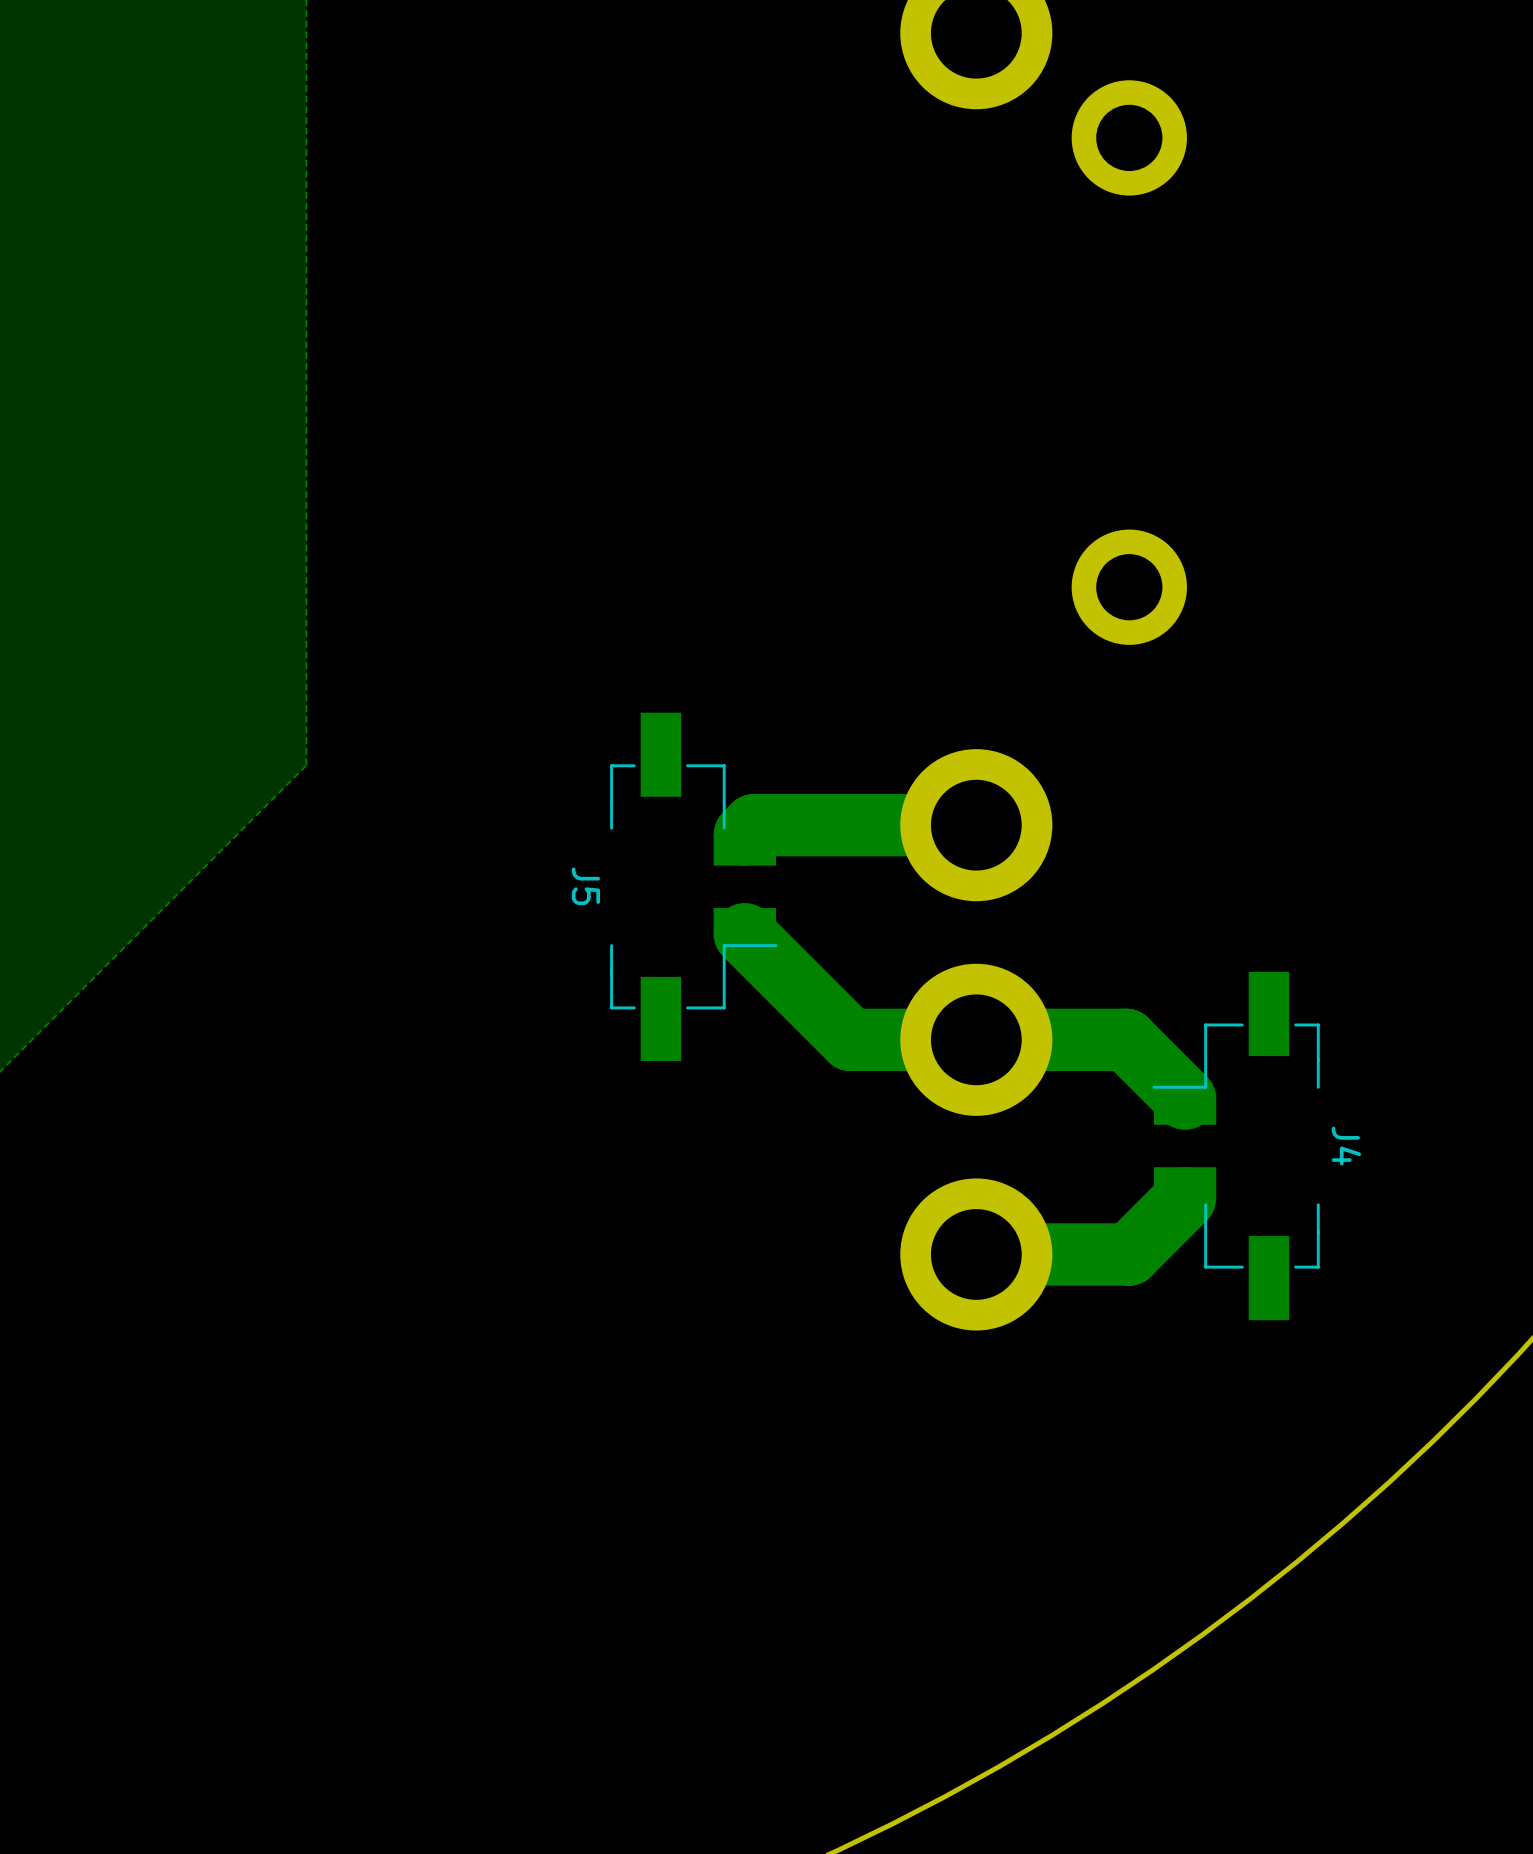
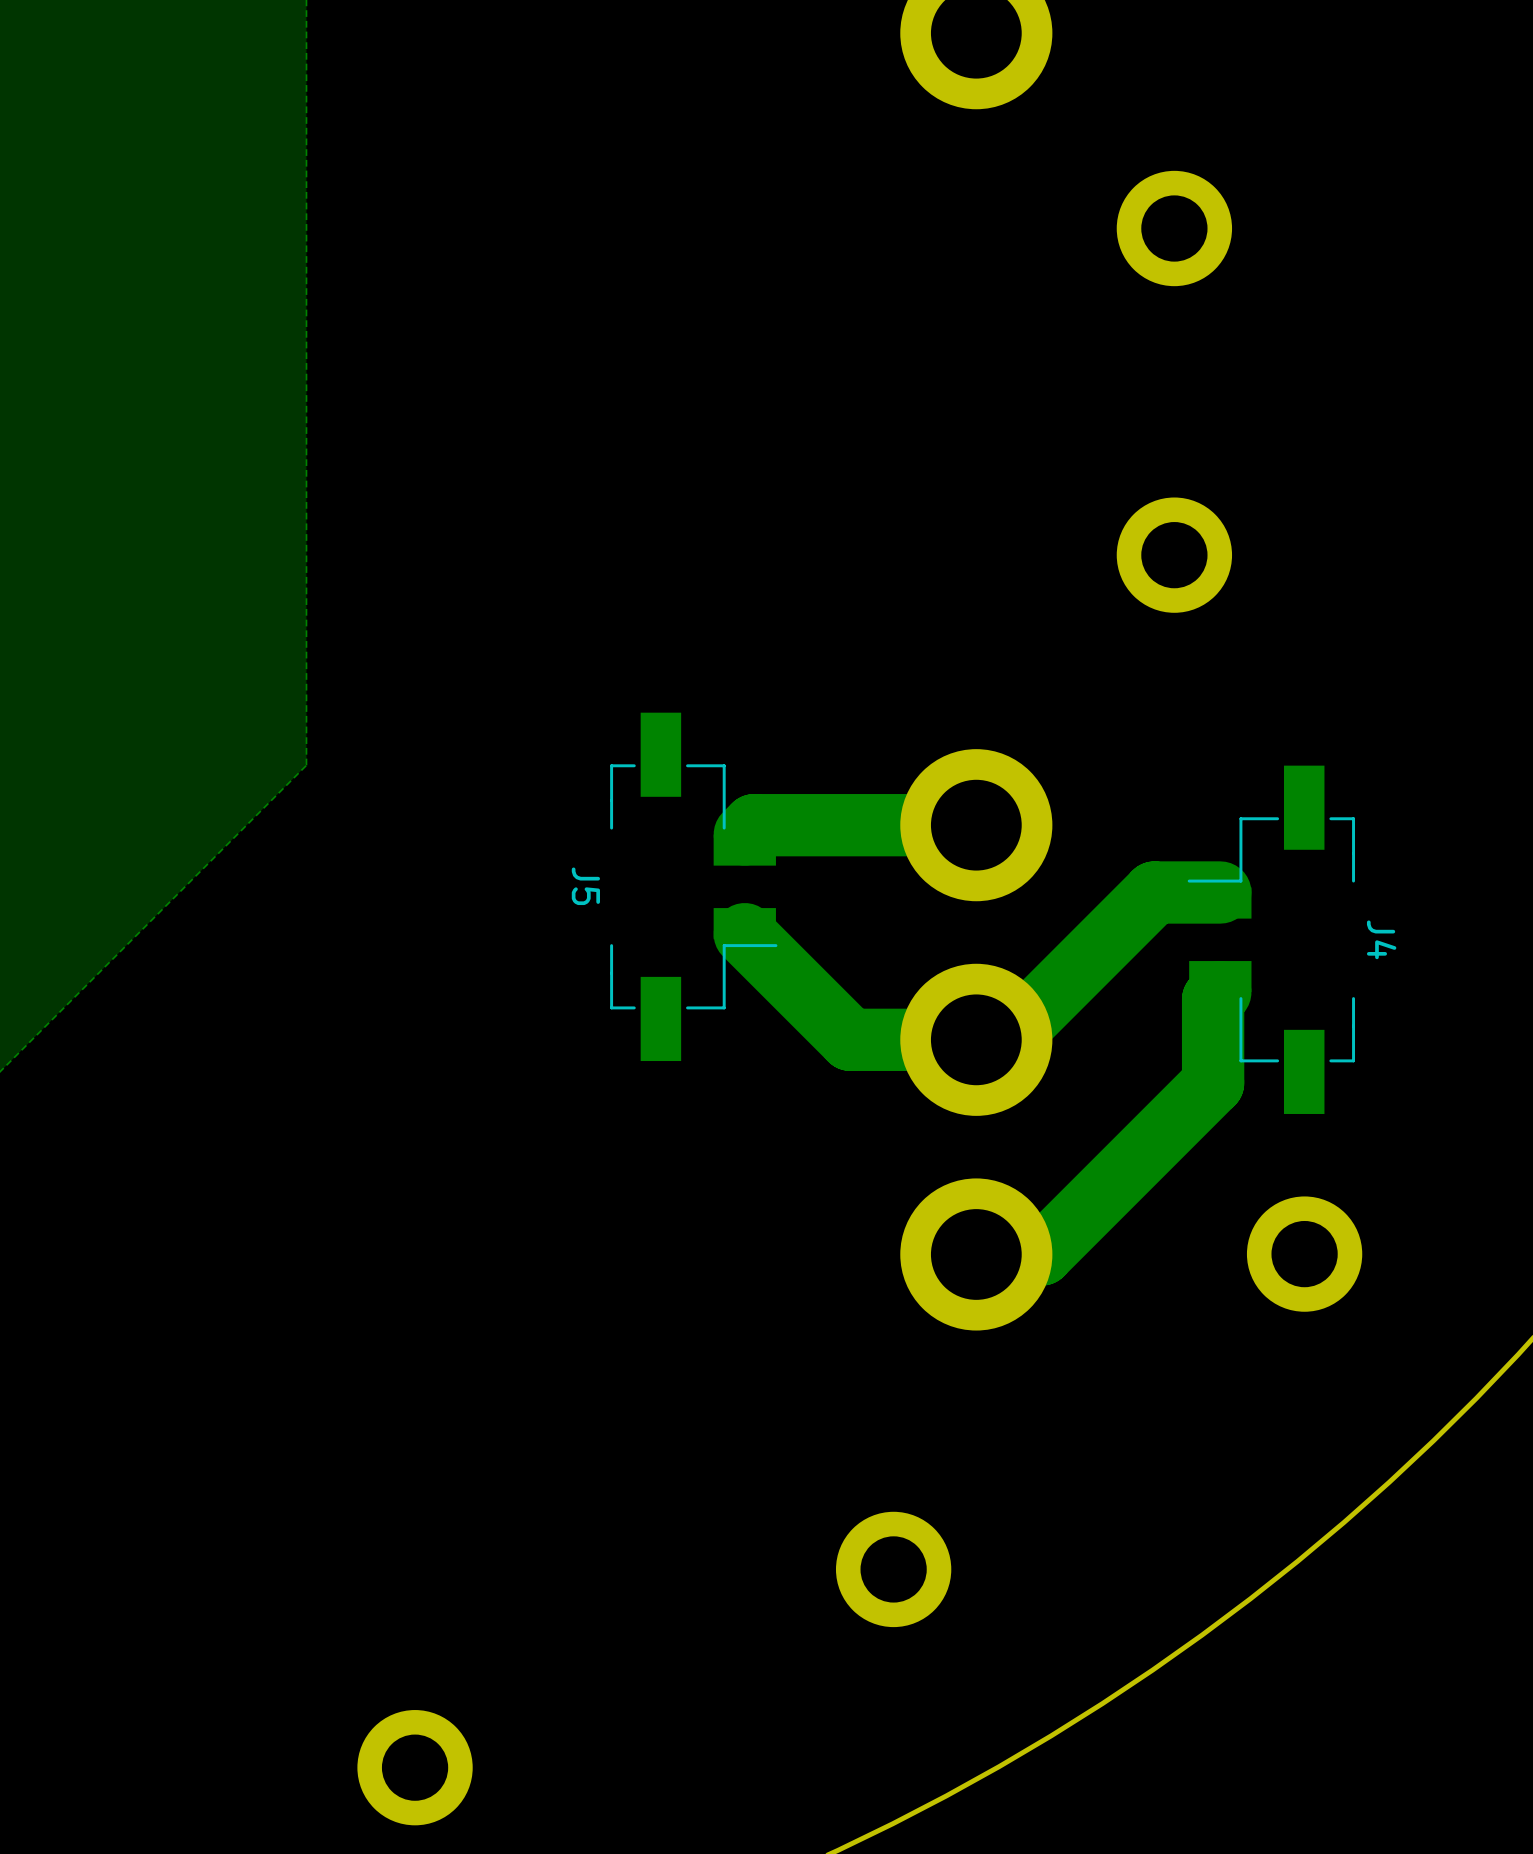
part position: (1129, 137) -> (1174, 228)
part position: (1129, 587) -> (1174, 555)
track: (1007, 1039) (1126, 1039) (1185, 1098) -> (1007, 1039) (1154, 892) (1220, 892)
J4 position: (1236, 1146) -> (1271, 939)
track: (1185, 1198) (1128, 1254) (1041, 1254) -> (1220, 992) (1213, 999) (1213, 1083) (1041, 1254)
part: none -> (1304, 1254)
part: none -> (893, 1569)
part: none -> (415, 1767)

